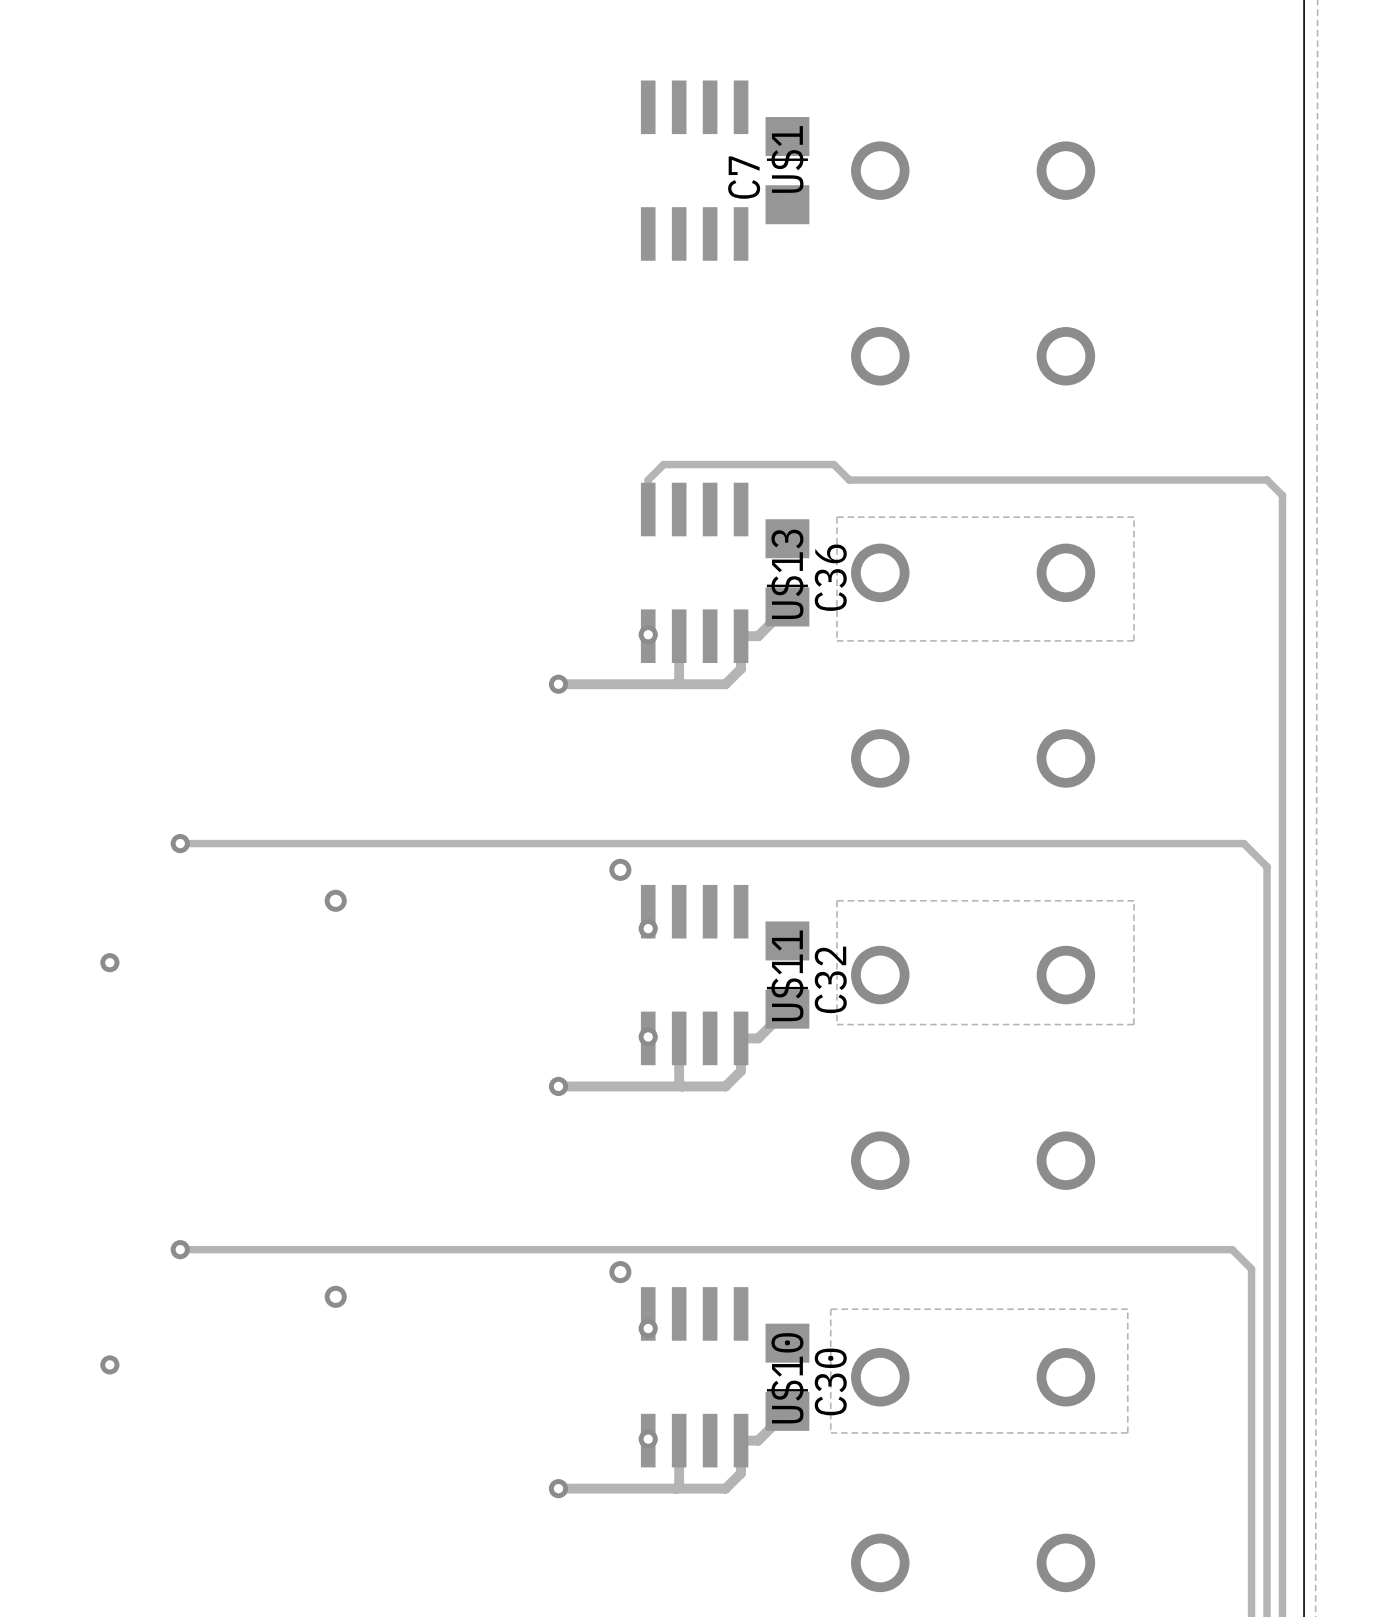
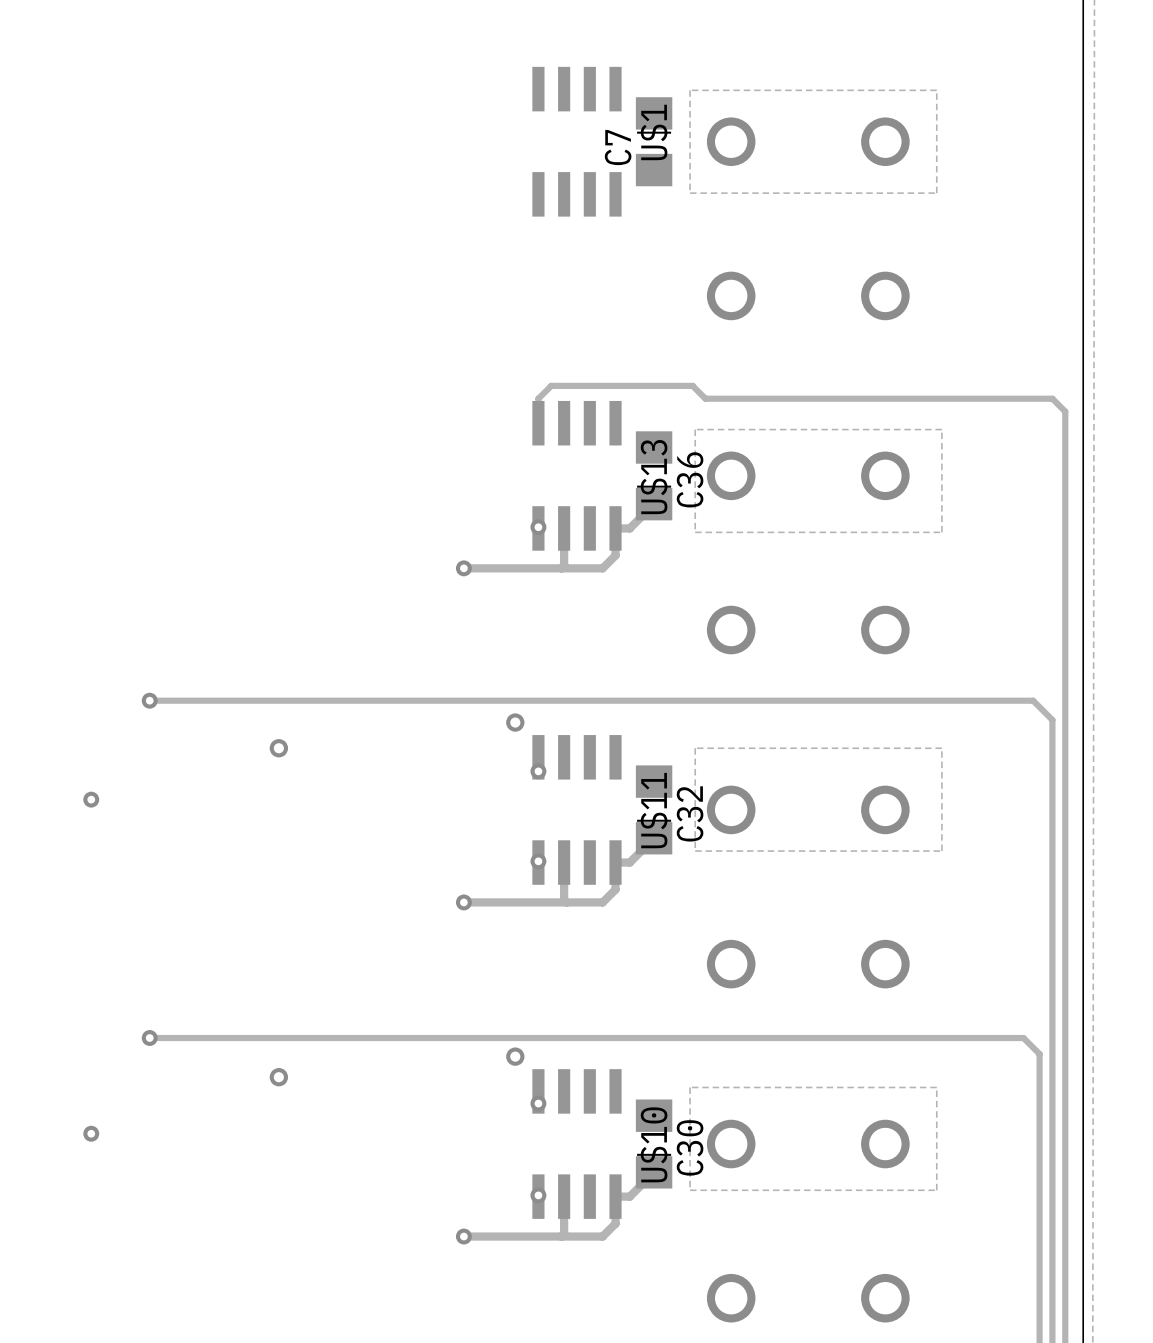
zone outline: none -> (936, 90) (690, 90) (690, 193) (936, 193) (936, 90)

